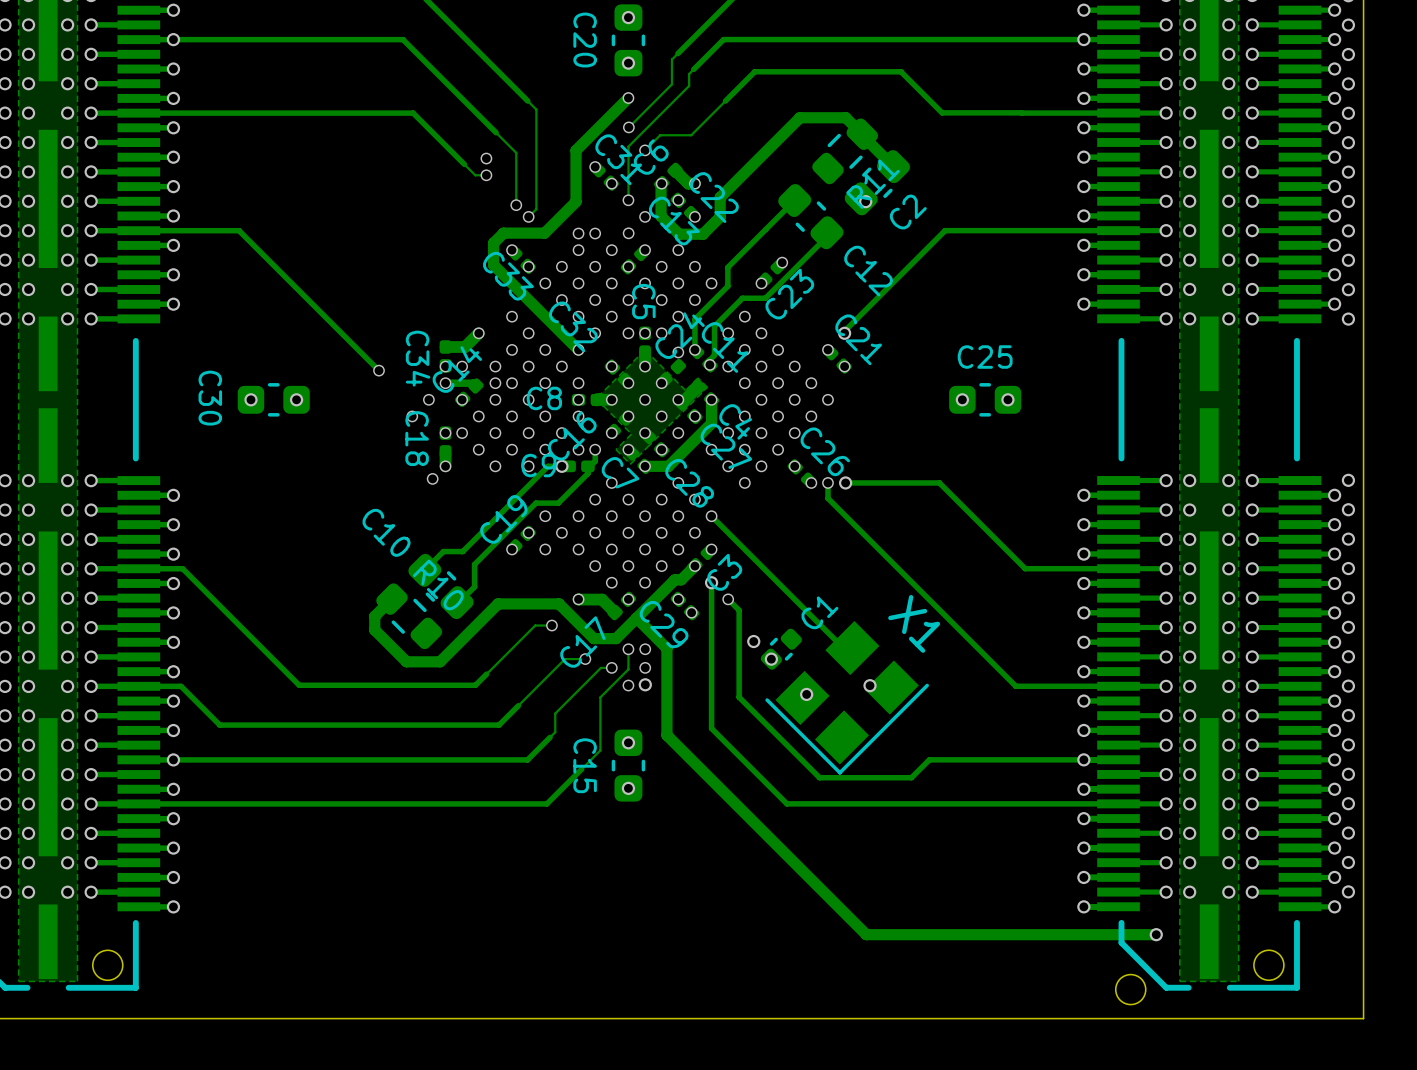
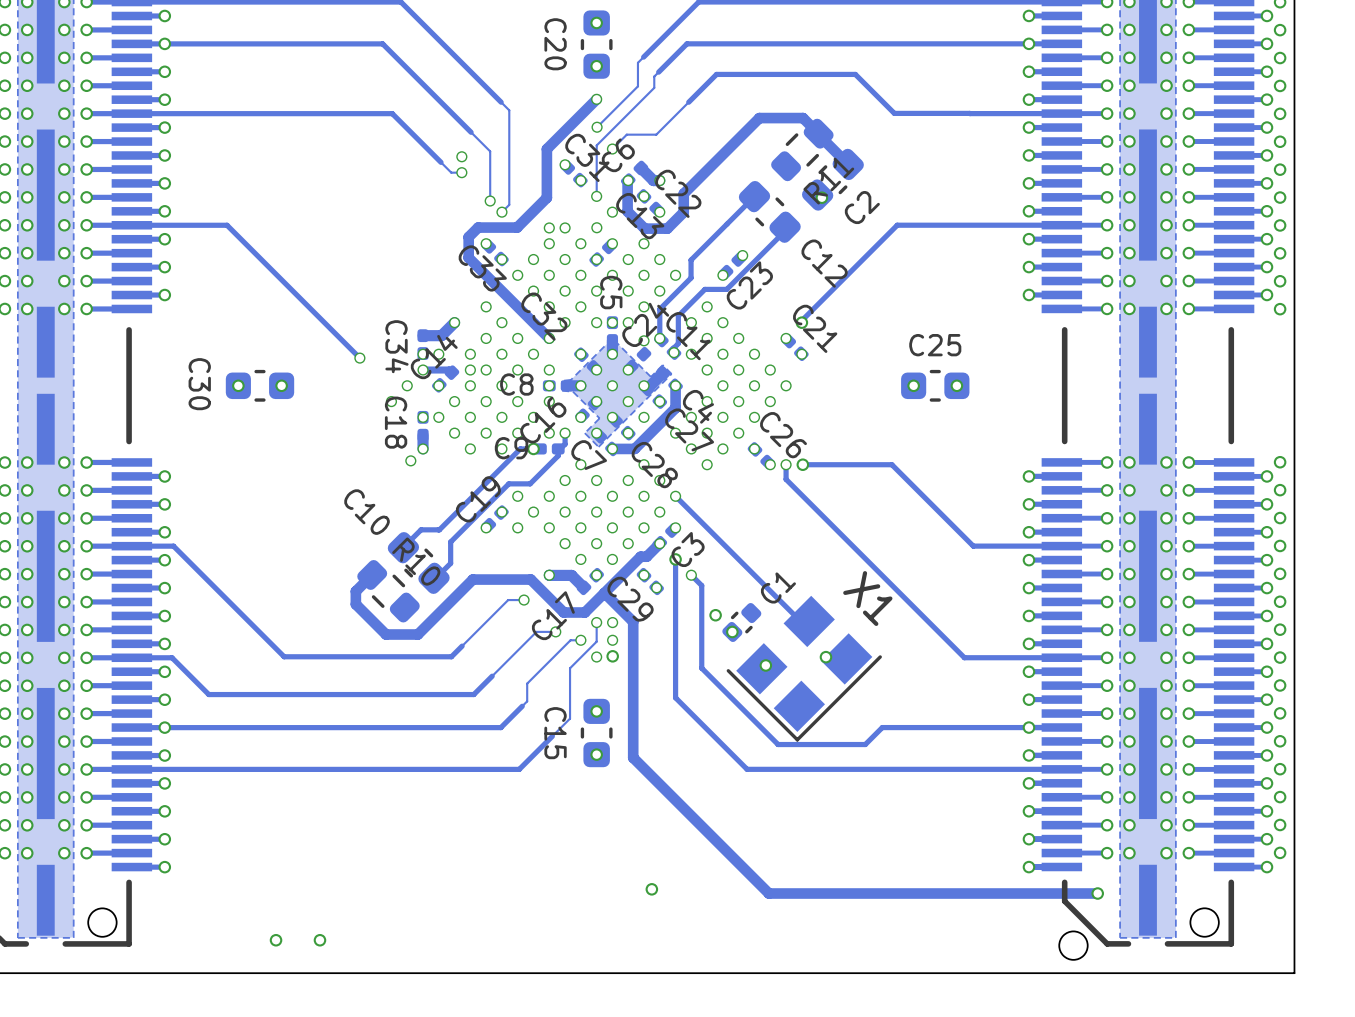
track: (666, 735) (866, 934) -> (633, 704) (633, 757) (768, 893) (822, 893)
via: none -> (651, 889)
via: none -> (276, 940)
via: none -> (319, 940)

